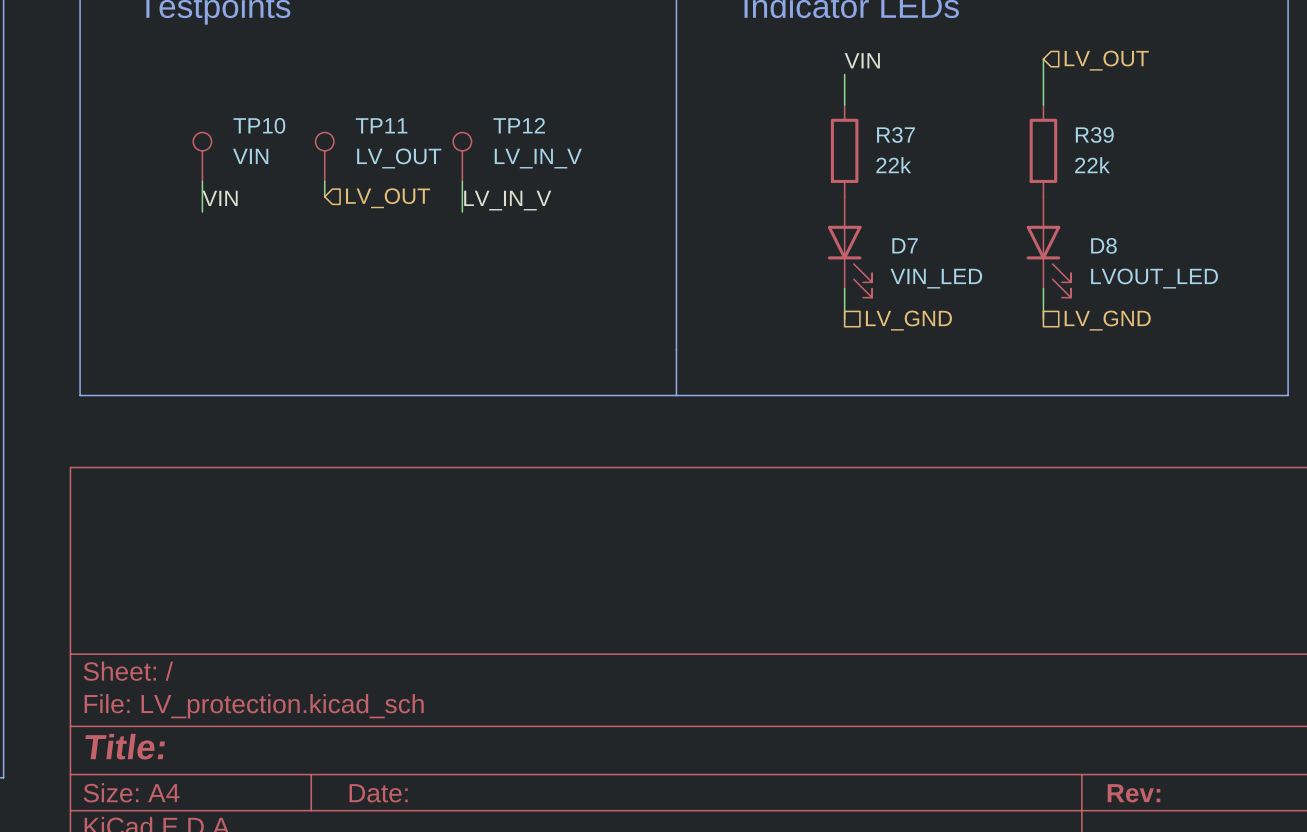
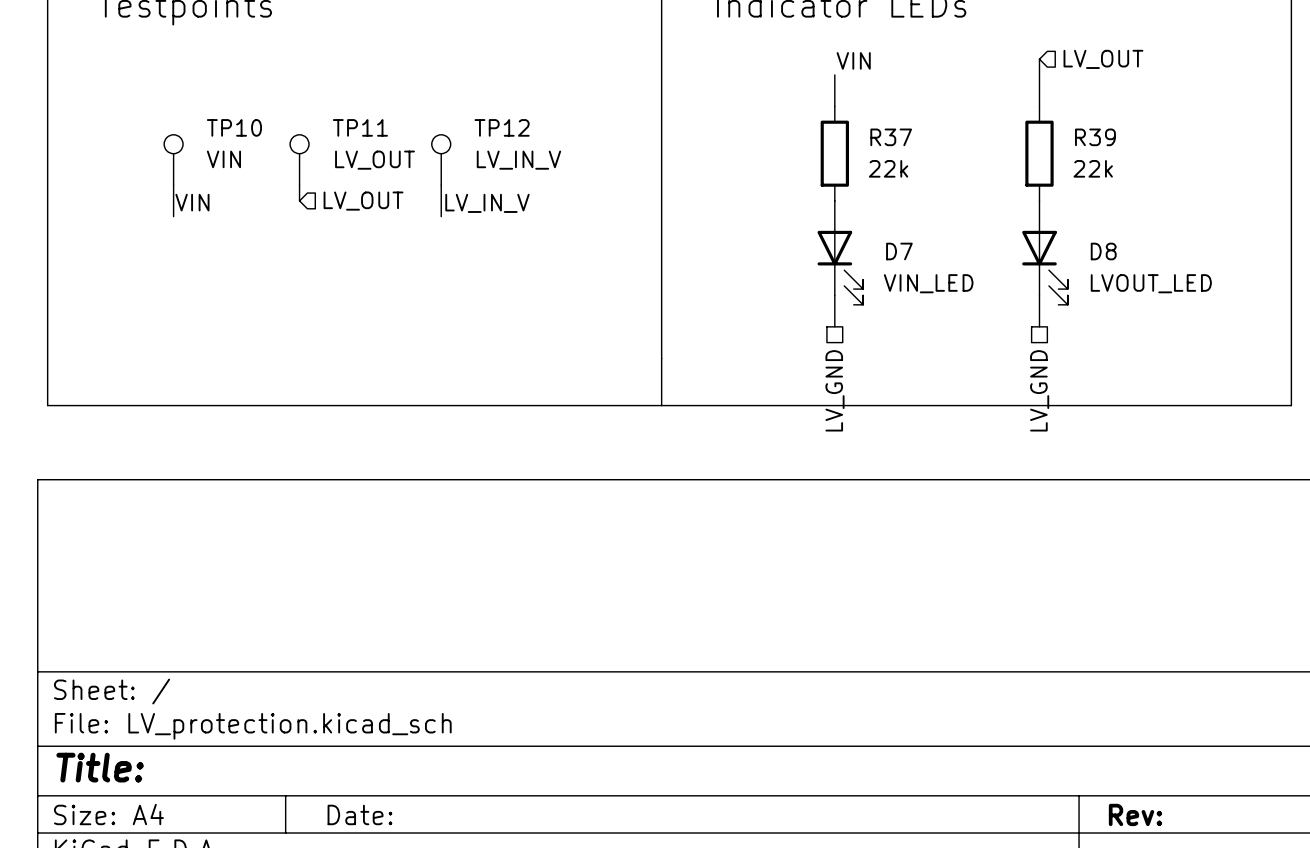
hierarchical label rotation: 0° (908, 320) -> 90° clockwise (834, 390)
hierarchical label rotation: 0° (1107, 320) -> 90° clockwise (1039, 390)

